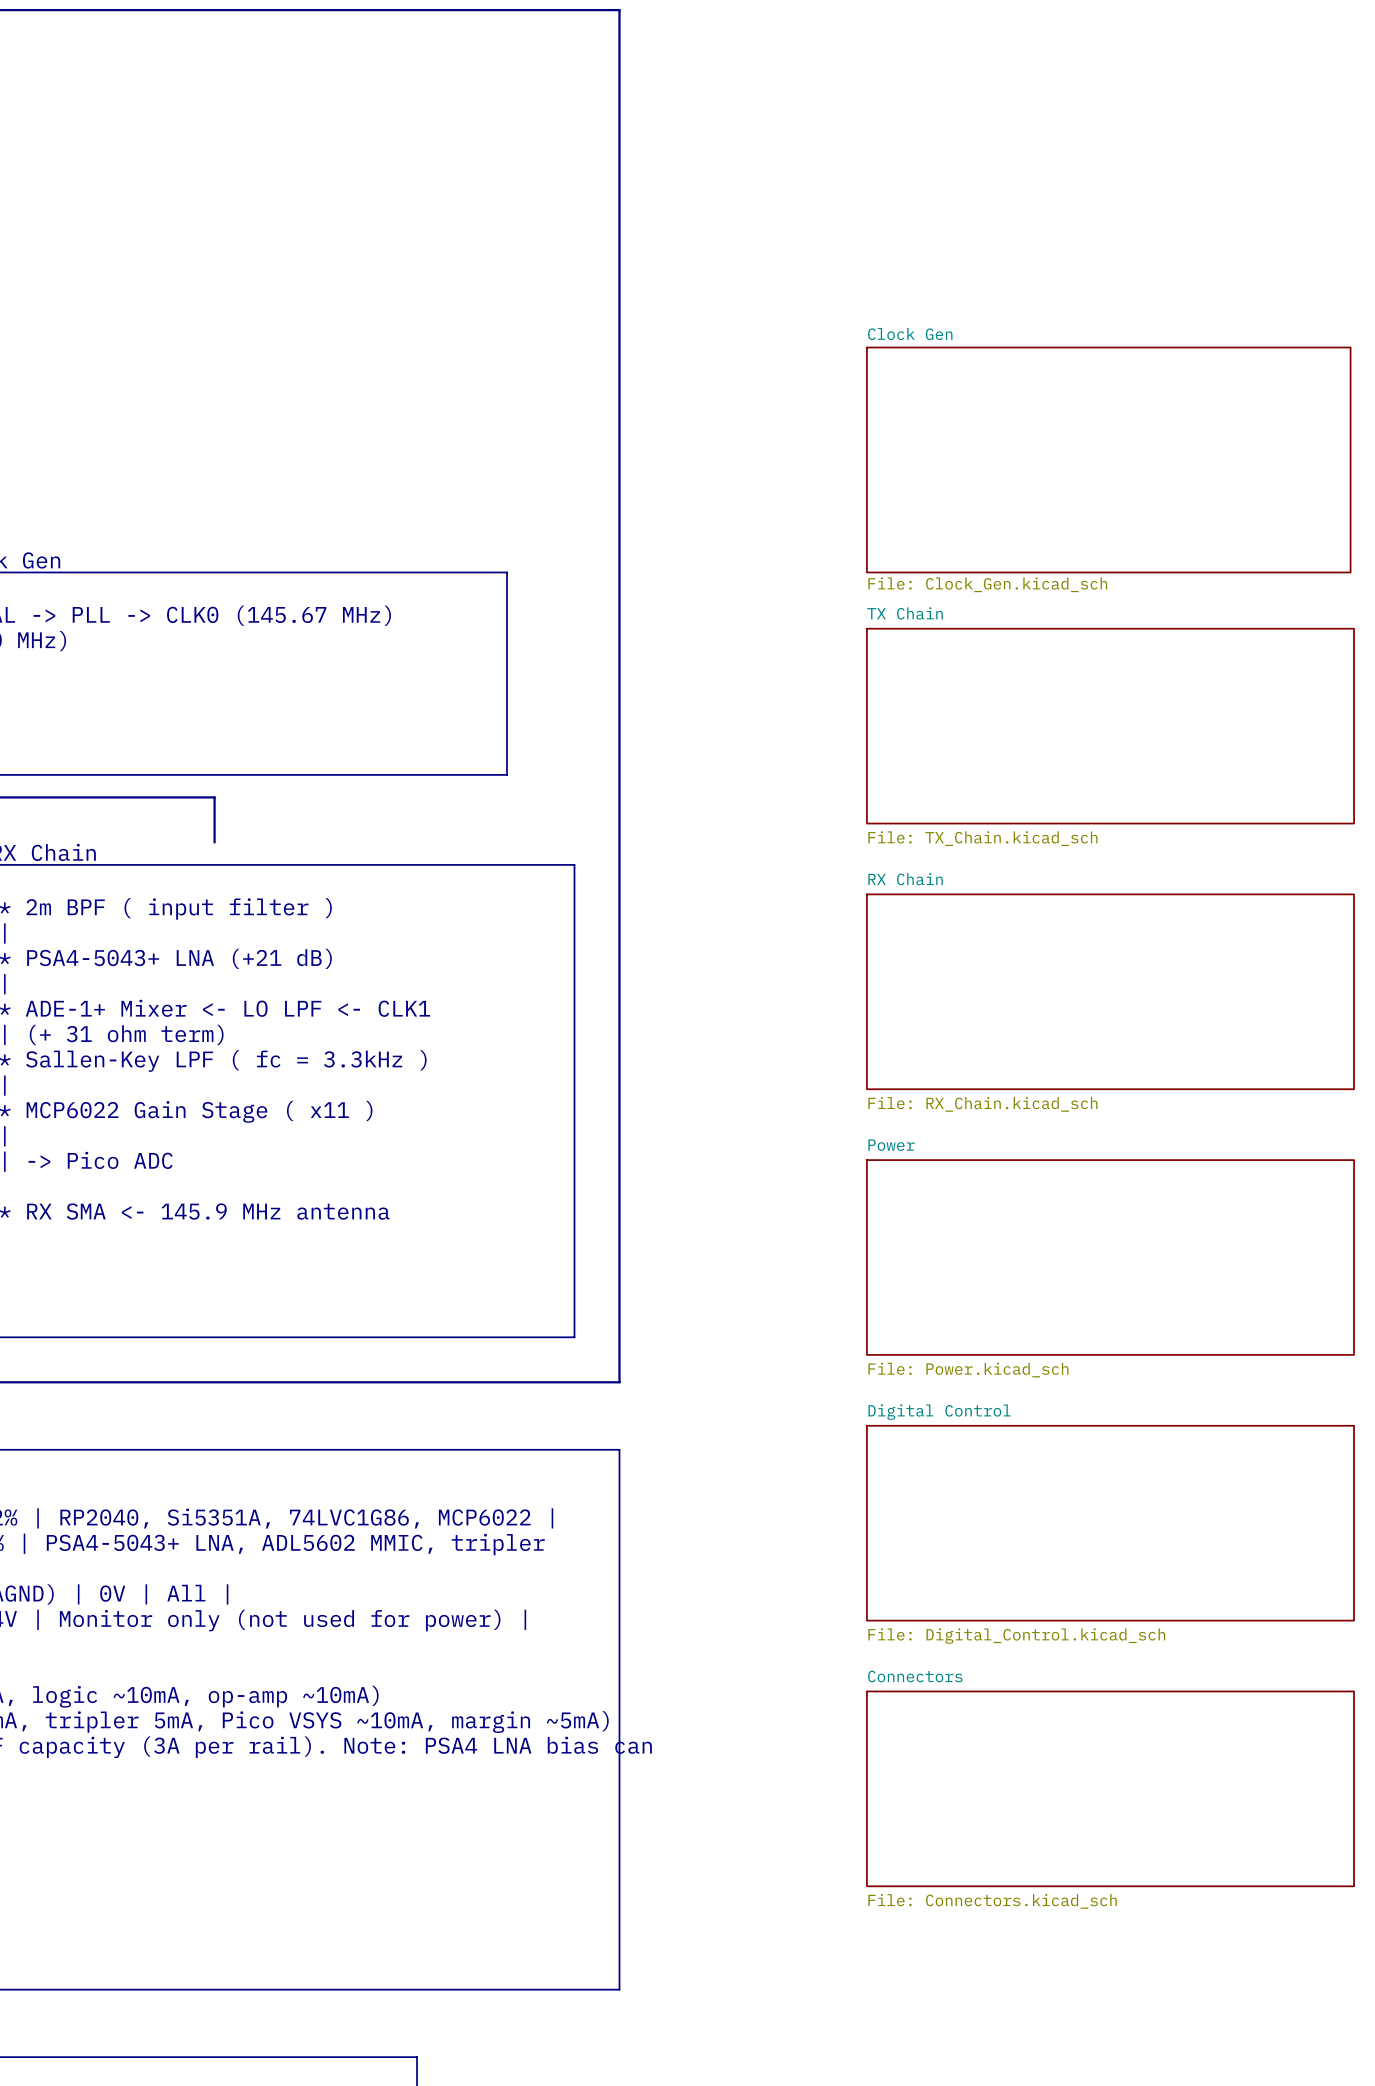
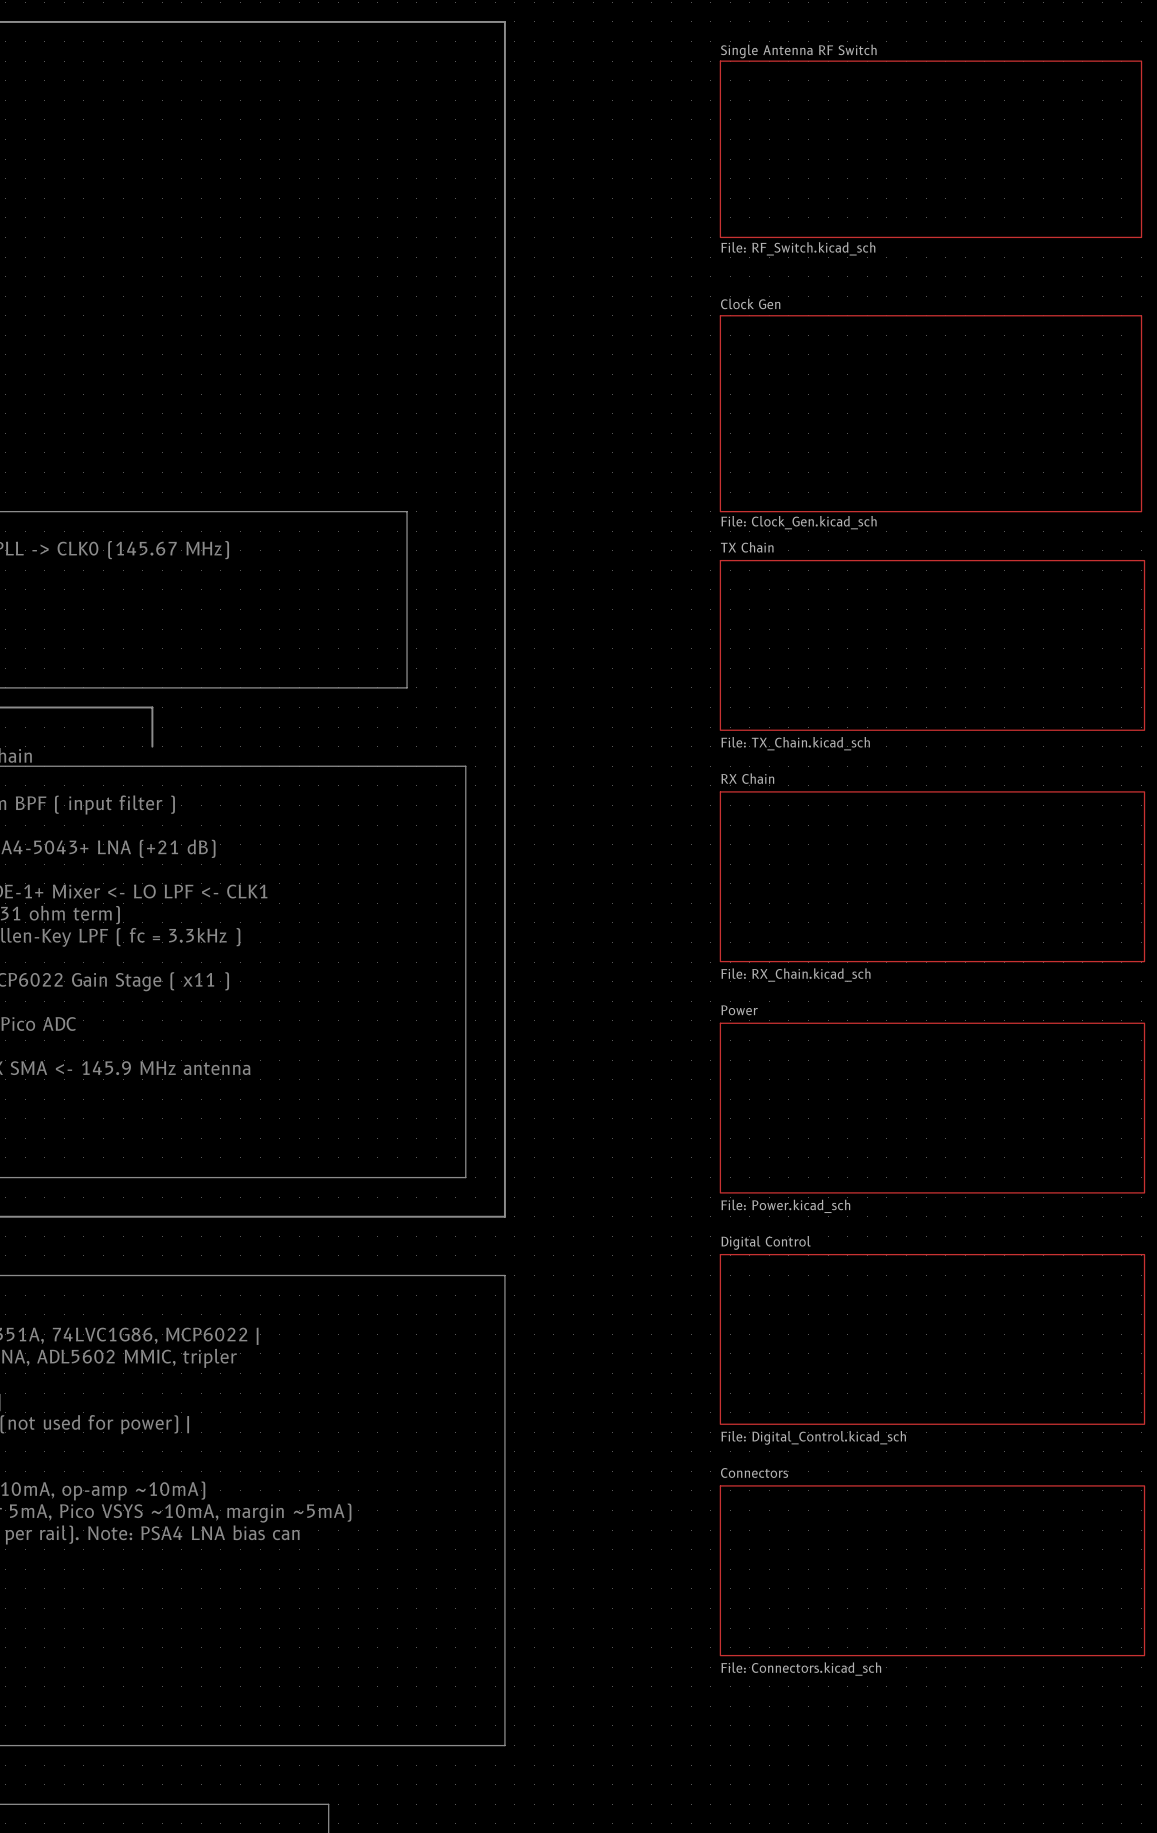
sheet Single Antenna RF Switch: none -> File: RF_Switch.kicad_sch (930, 149)

